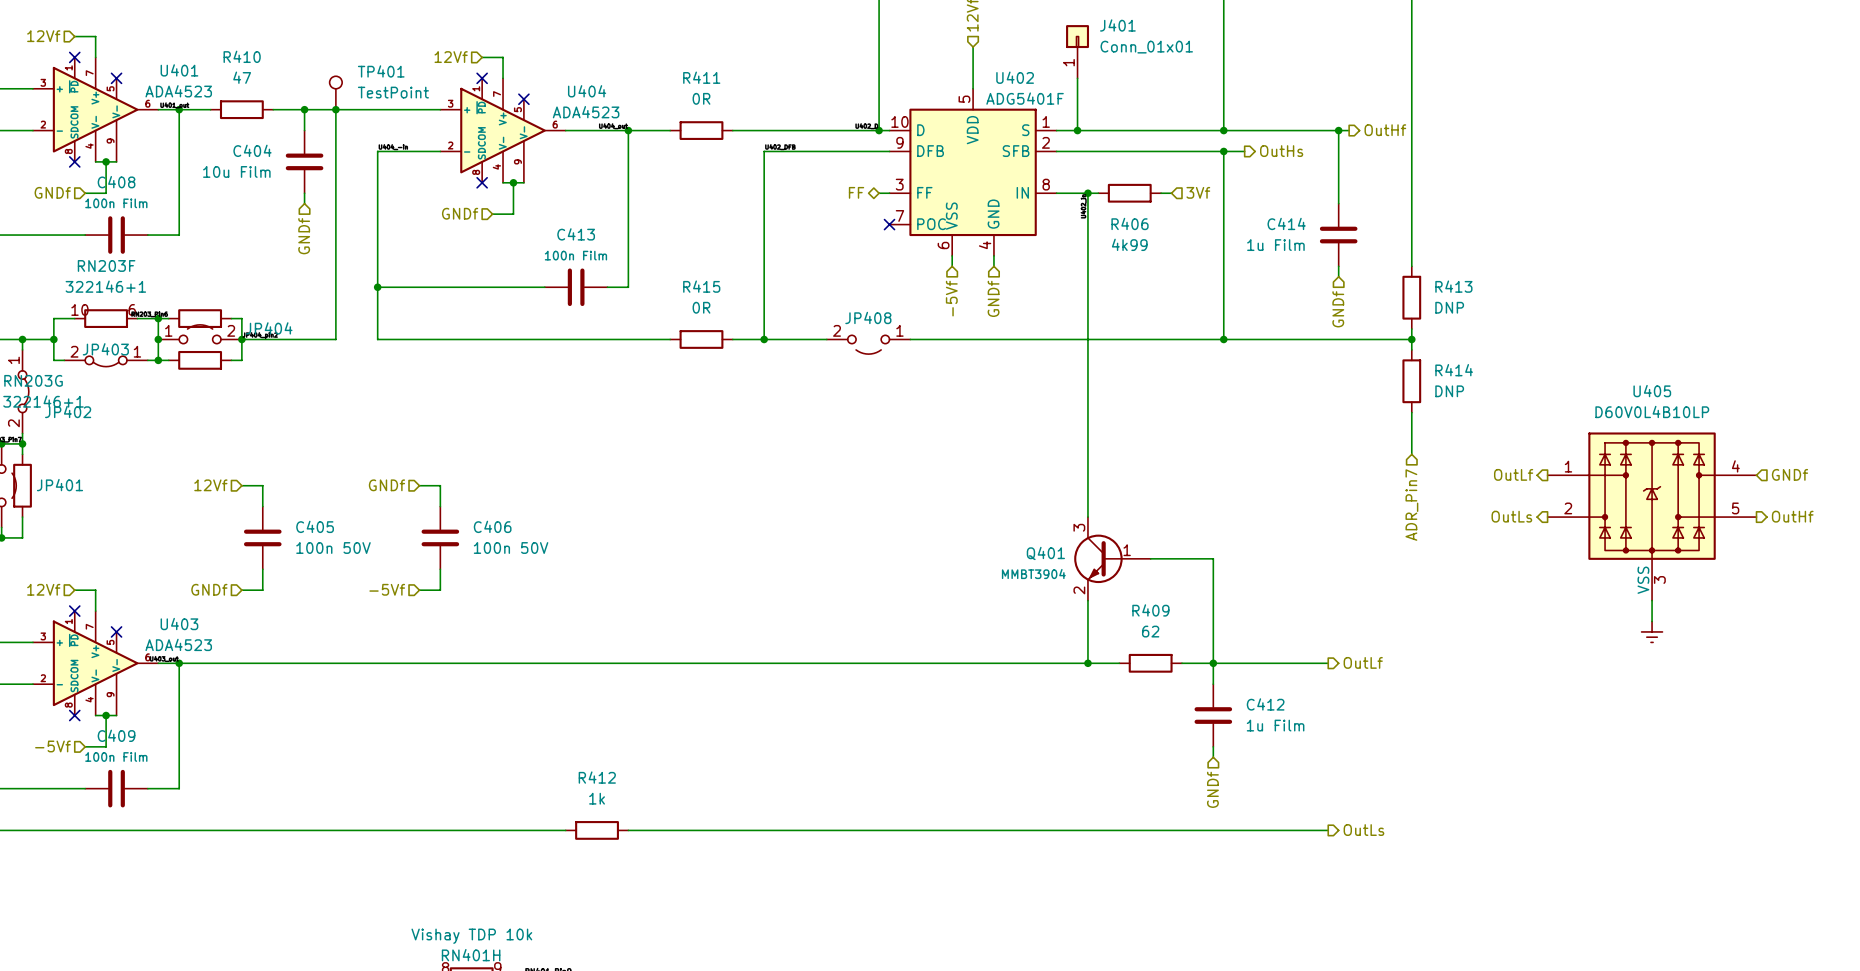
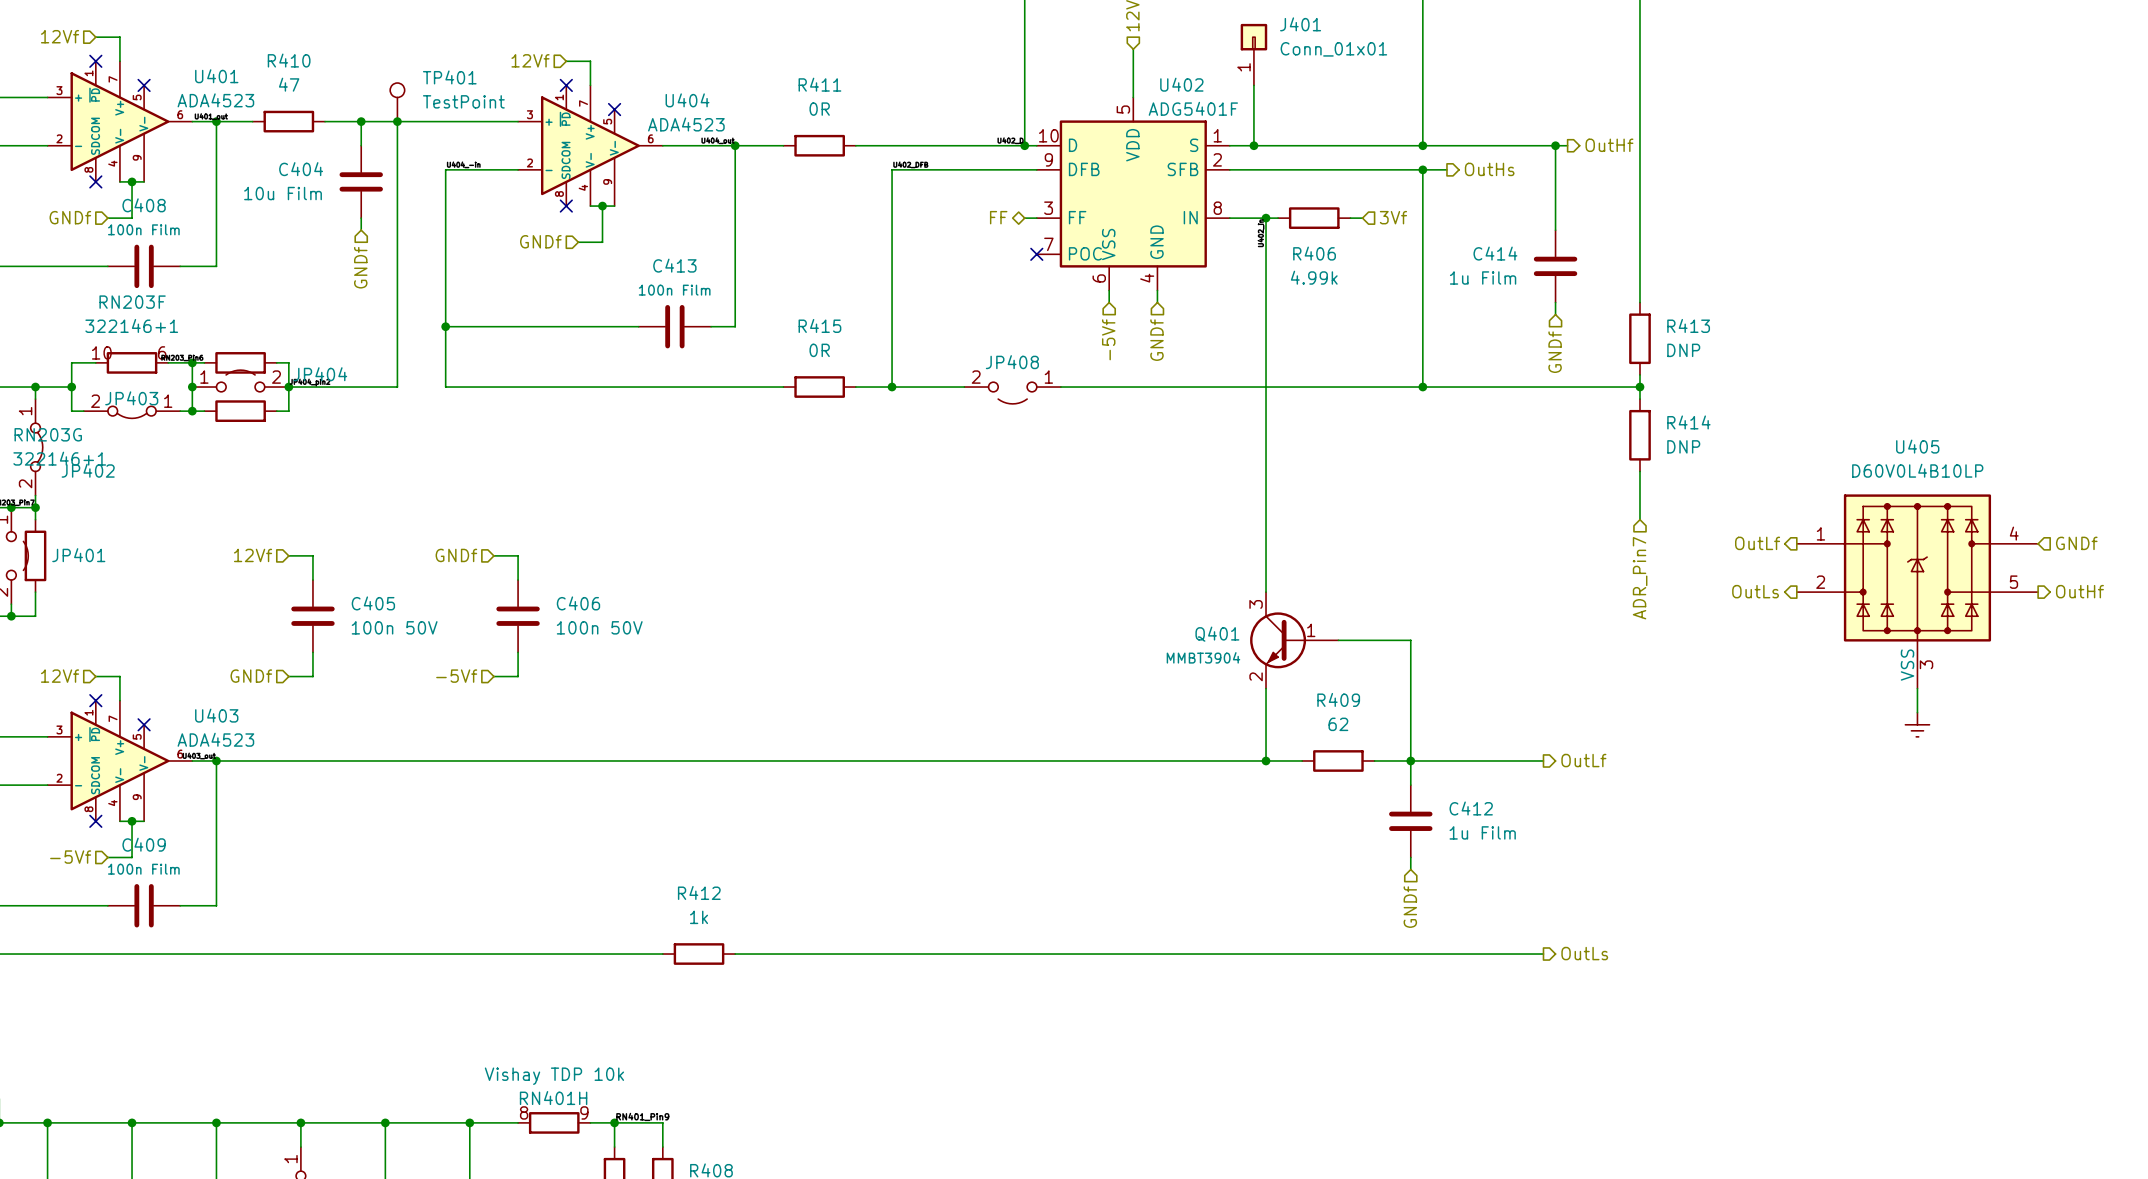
R406 value: 4k99 (1129, 244) -> 4.99k (1314, 277)

